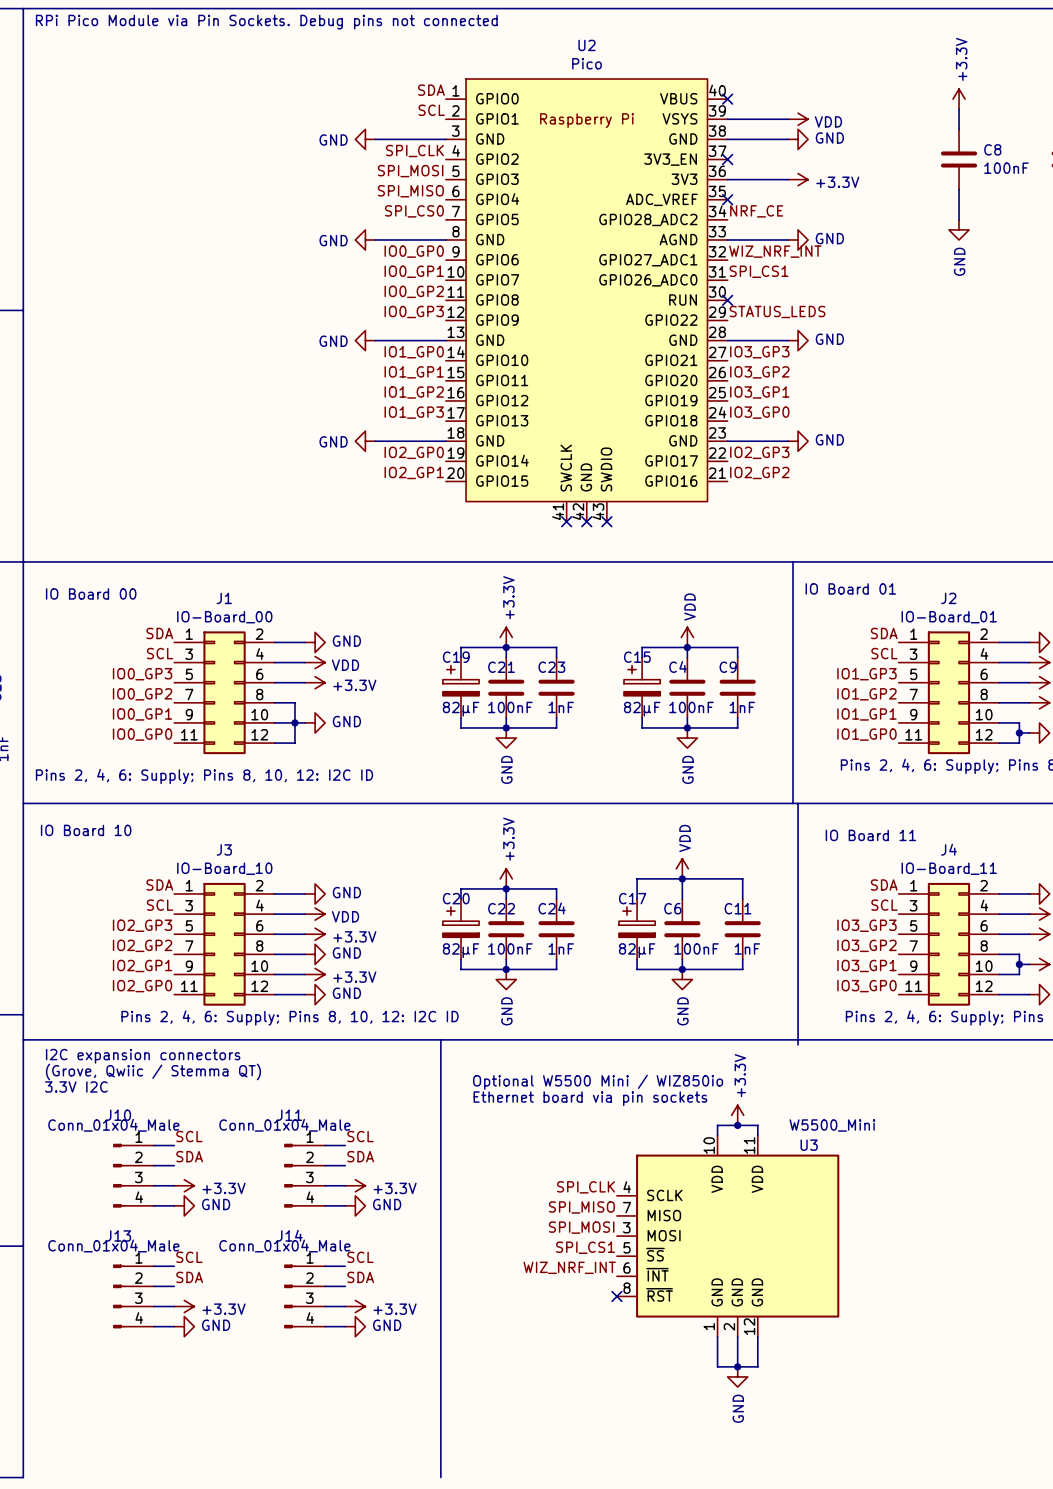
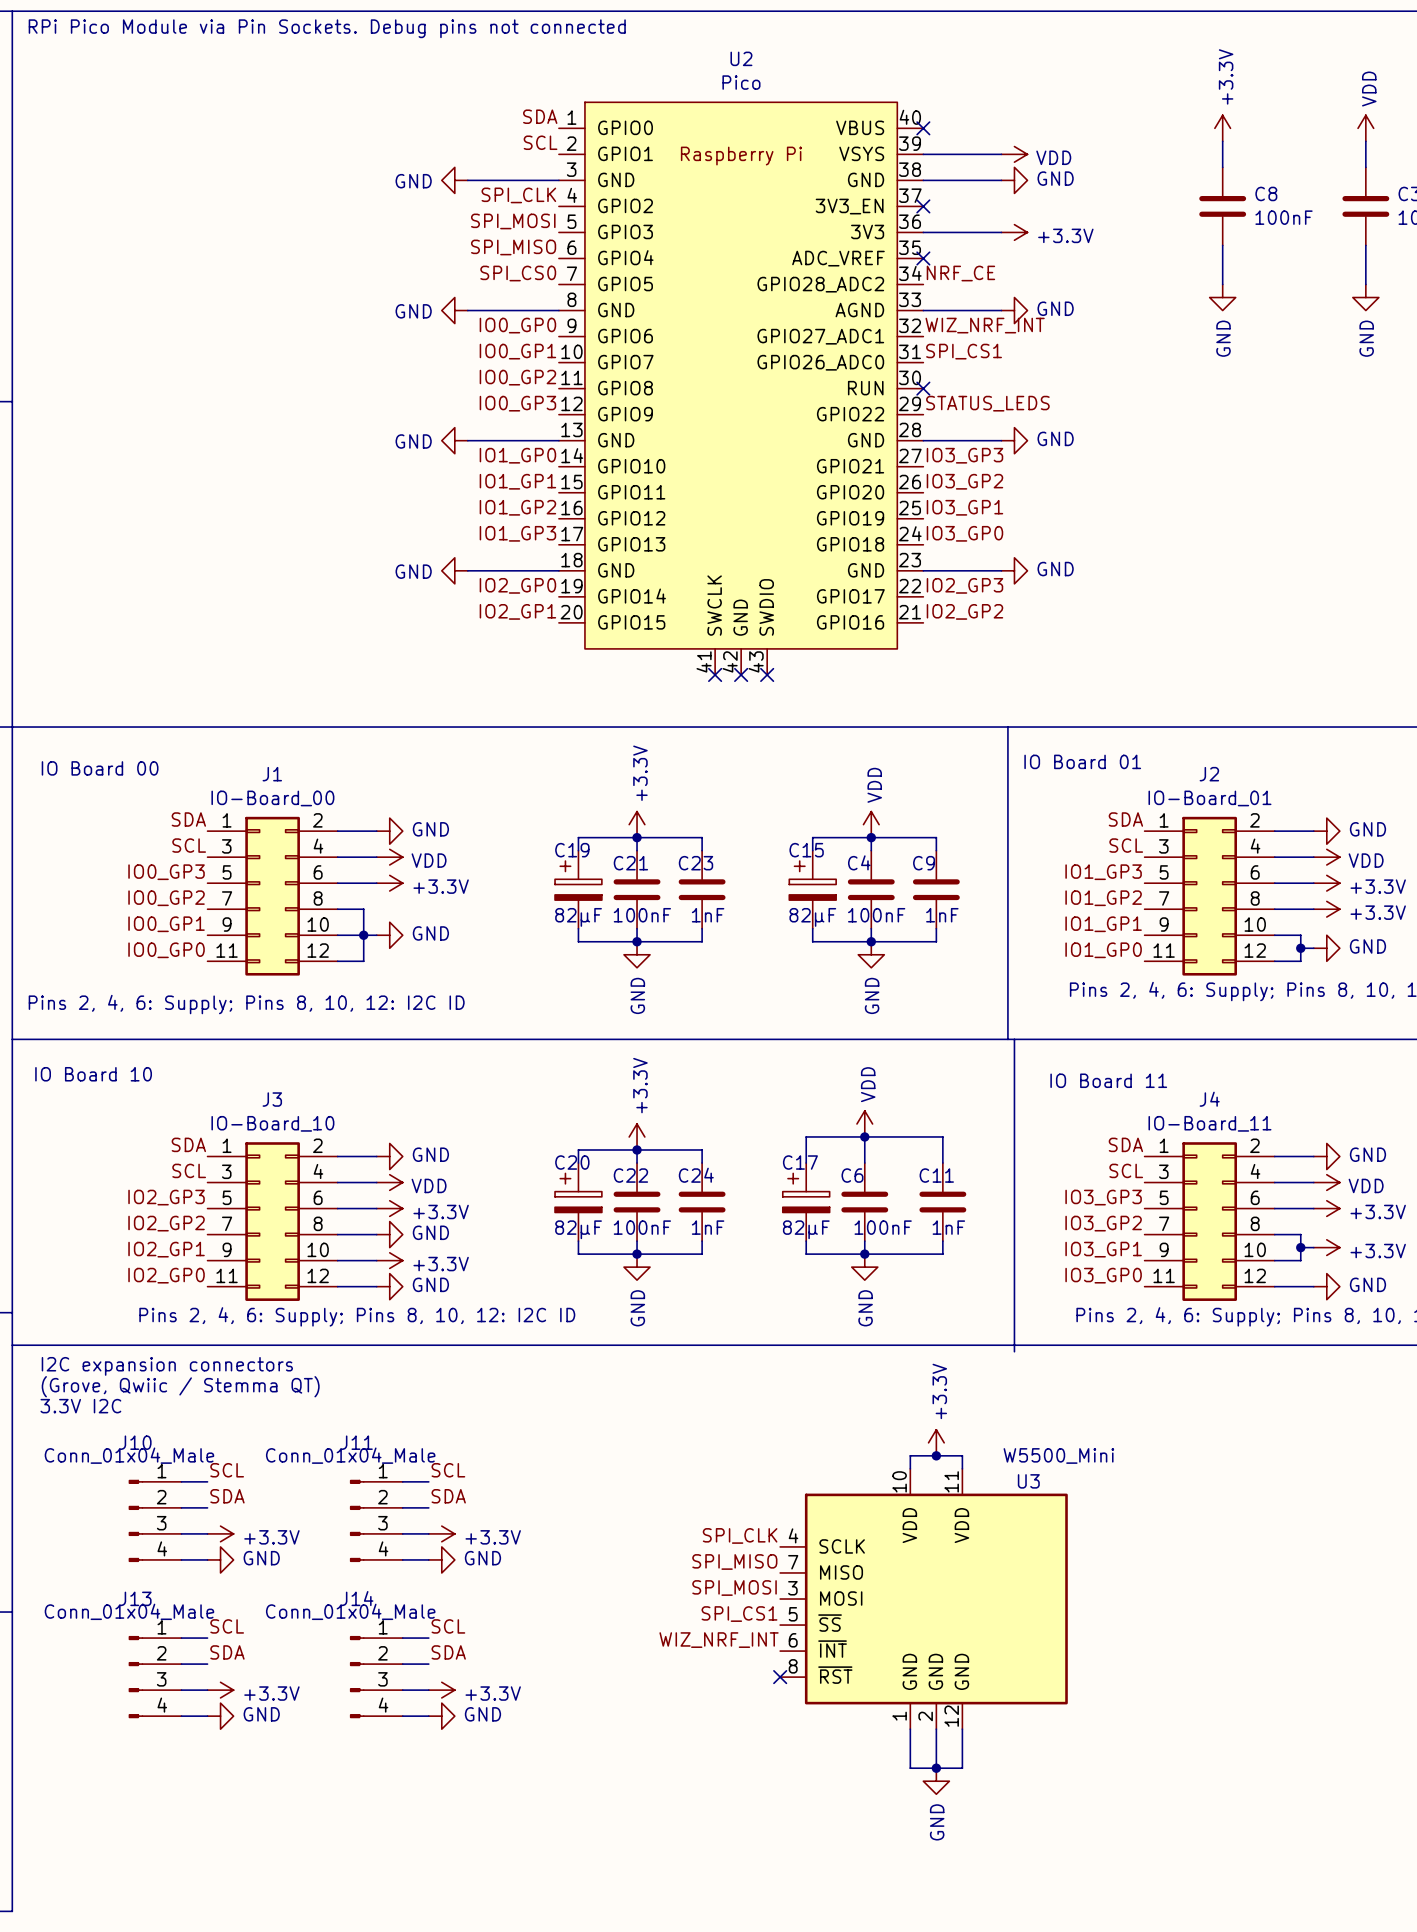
line: (440, 1039) (440, 1477) -> none
text: Optional W5500 Mini / WIZ850io (598, 1082) -> none
text: Ethernet board via pin sockets (590, 1098) -> none

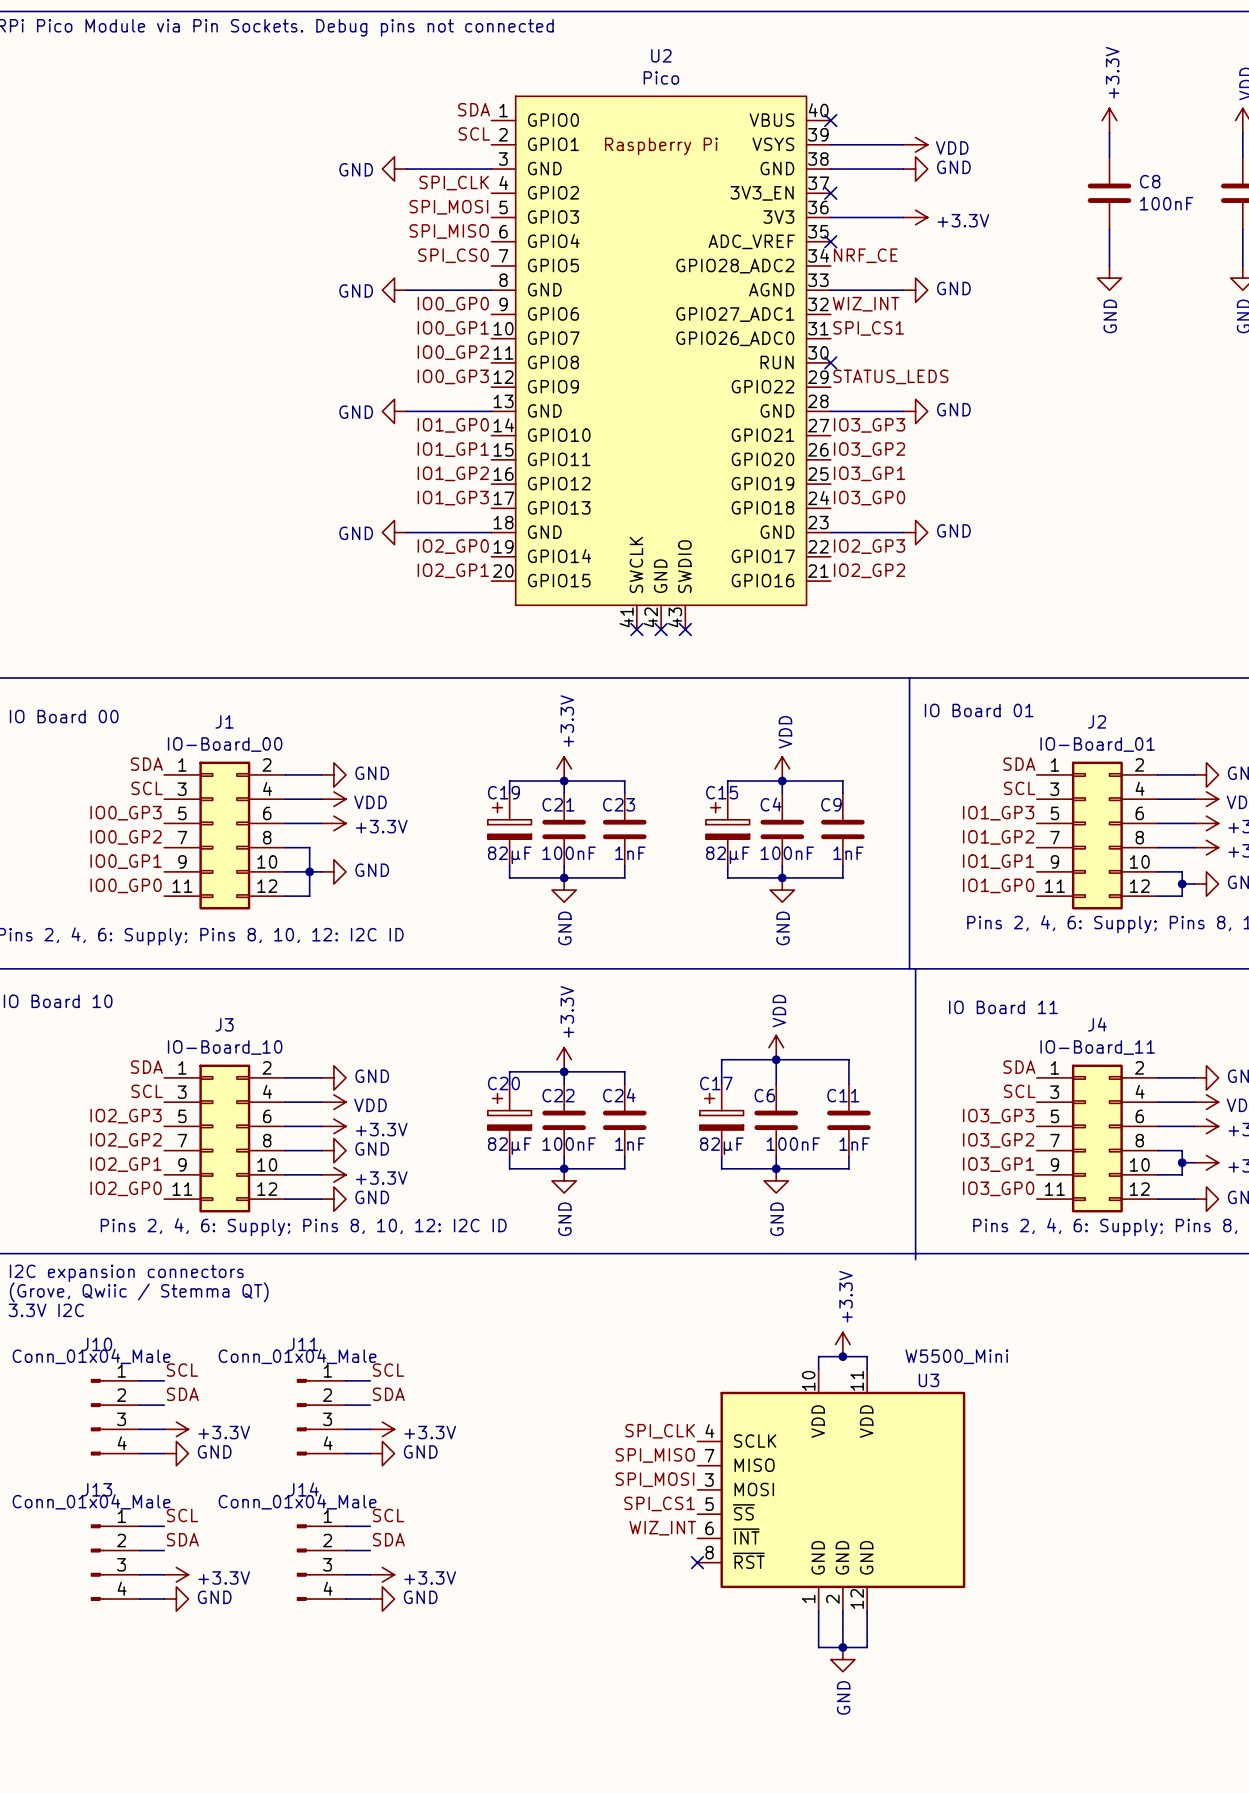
label: WIZ_NRF_INT (985, 325) -> WIZ_INT (866, 304)
label: WIZ_NRF_INT (719, 1640) -> WIZ_INT (662, 1528)

